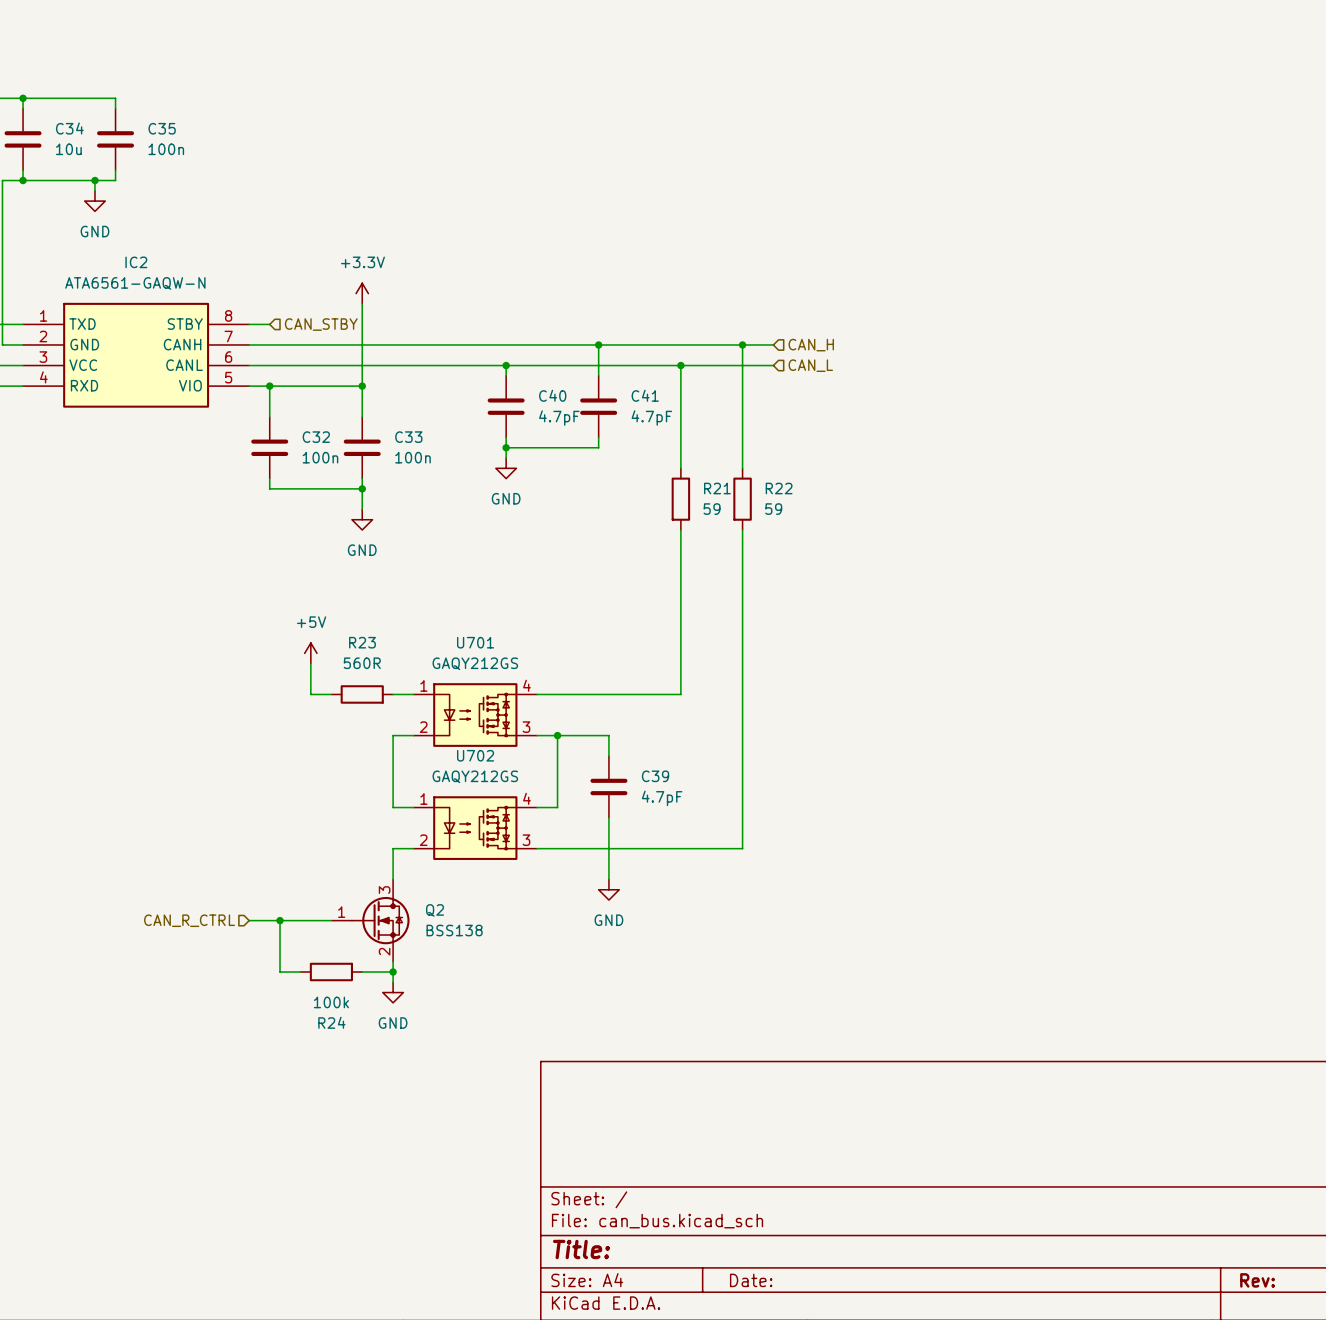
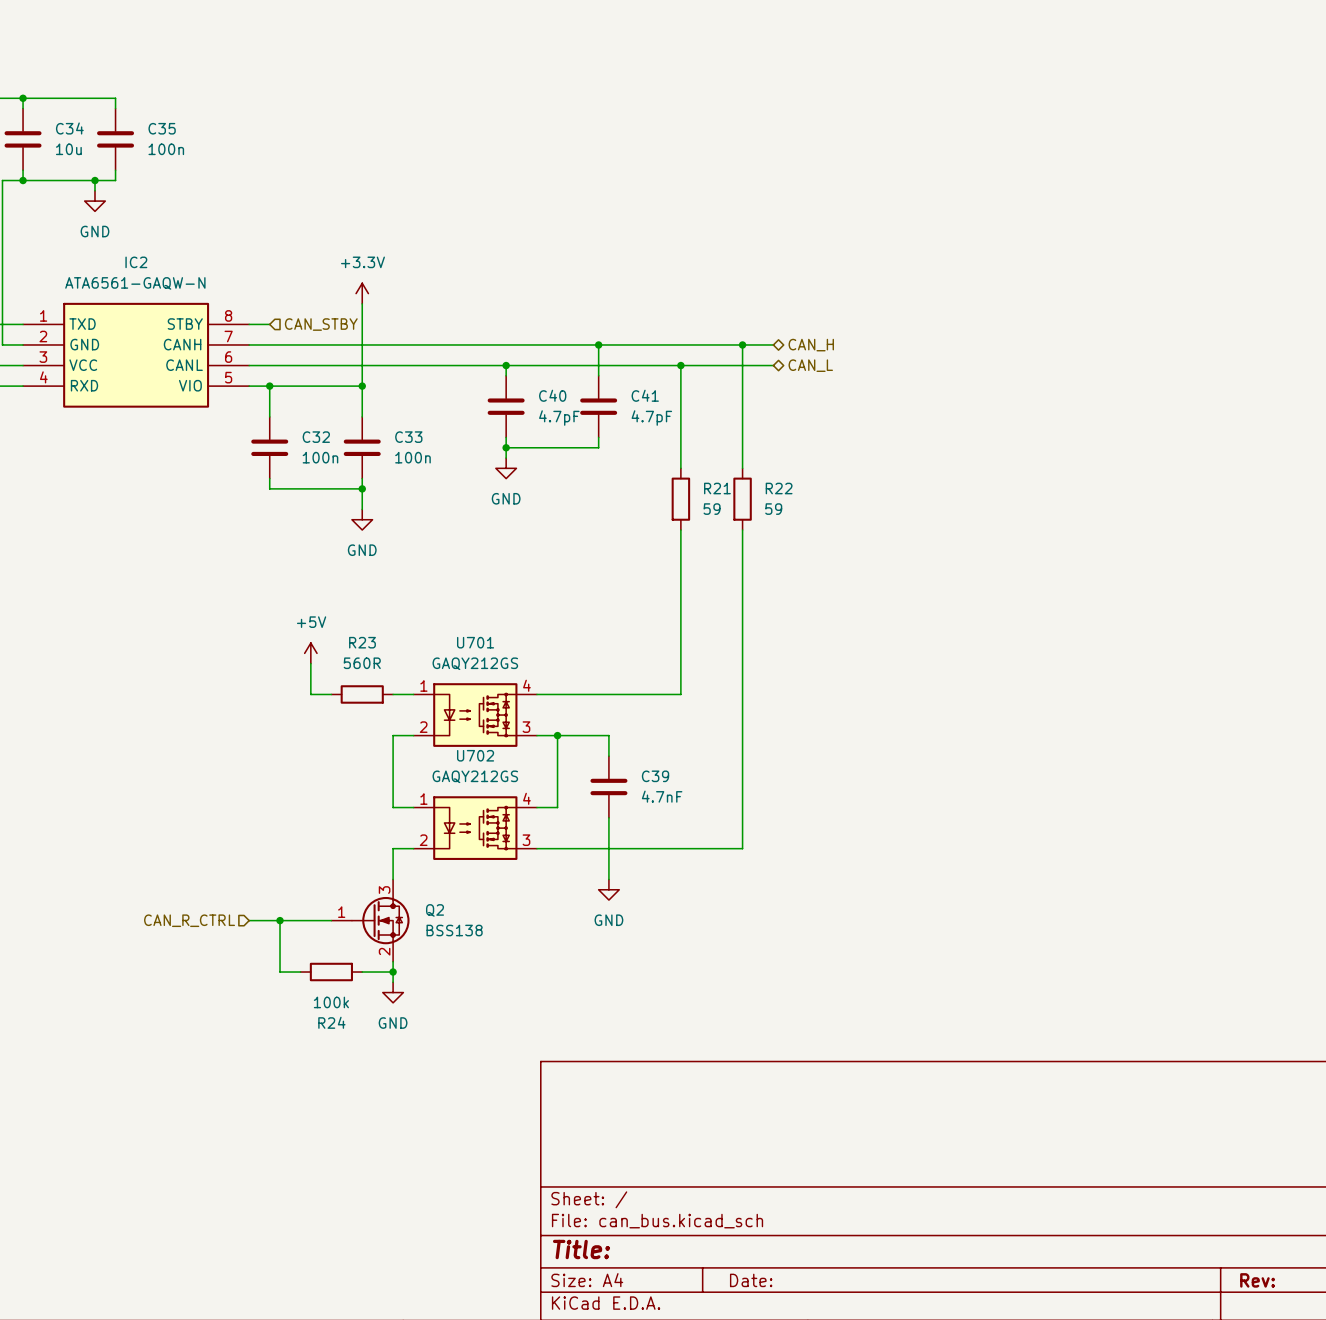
hierarchical label shape: input (811, 345) -> bidirectional (811, 345)
hierarchical label shape: input (810, 365) -> bidirectional (810, 365)
C39 value: 4.7pF (662, 798) -> 4.7nF (662, 796)

